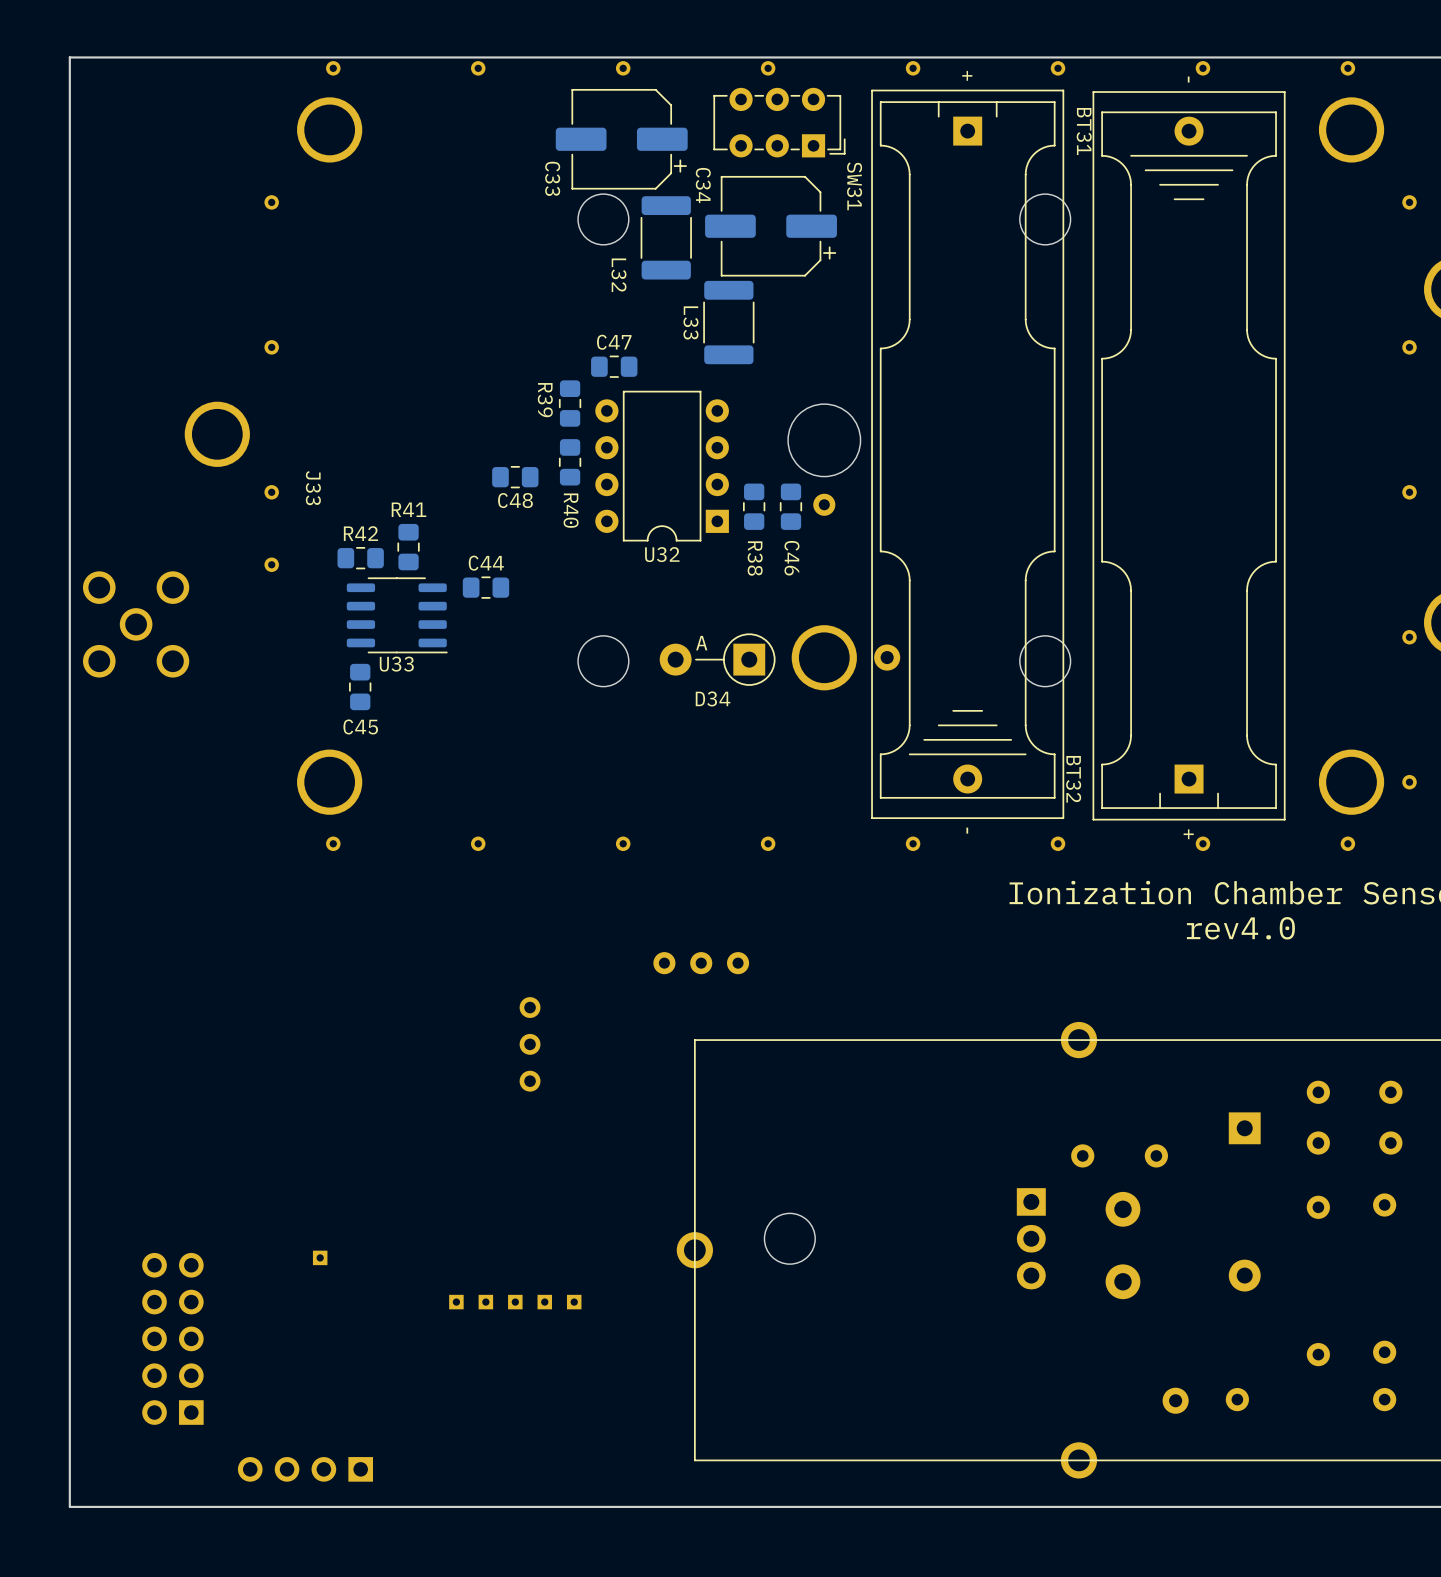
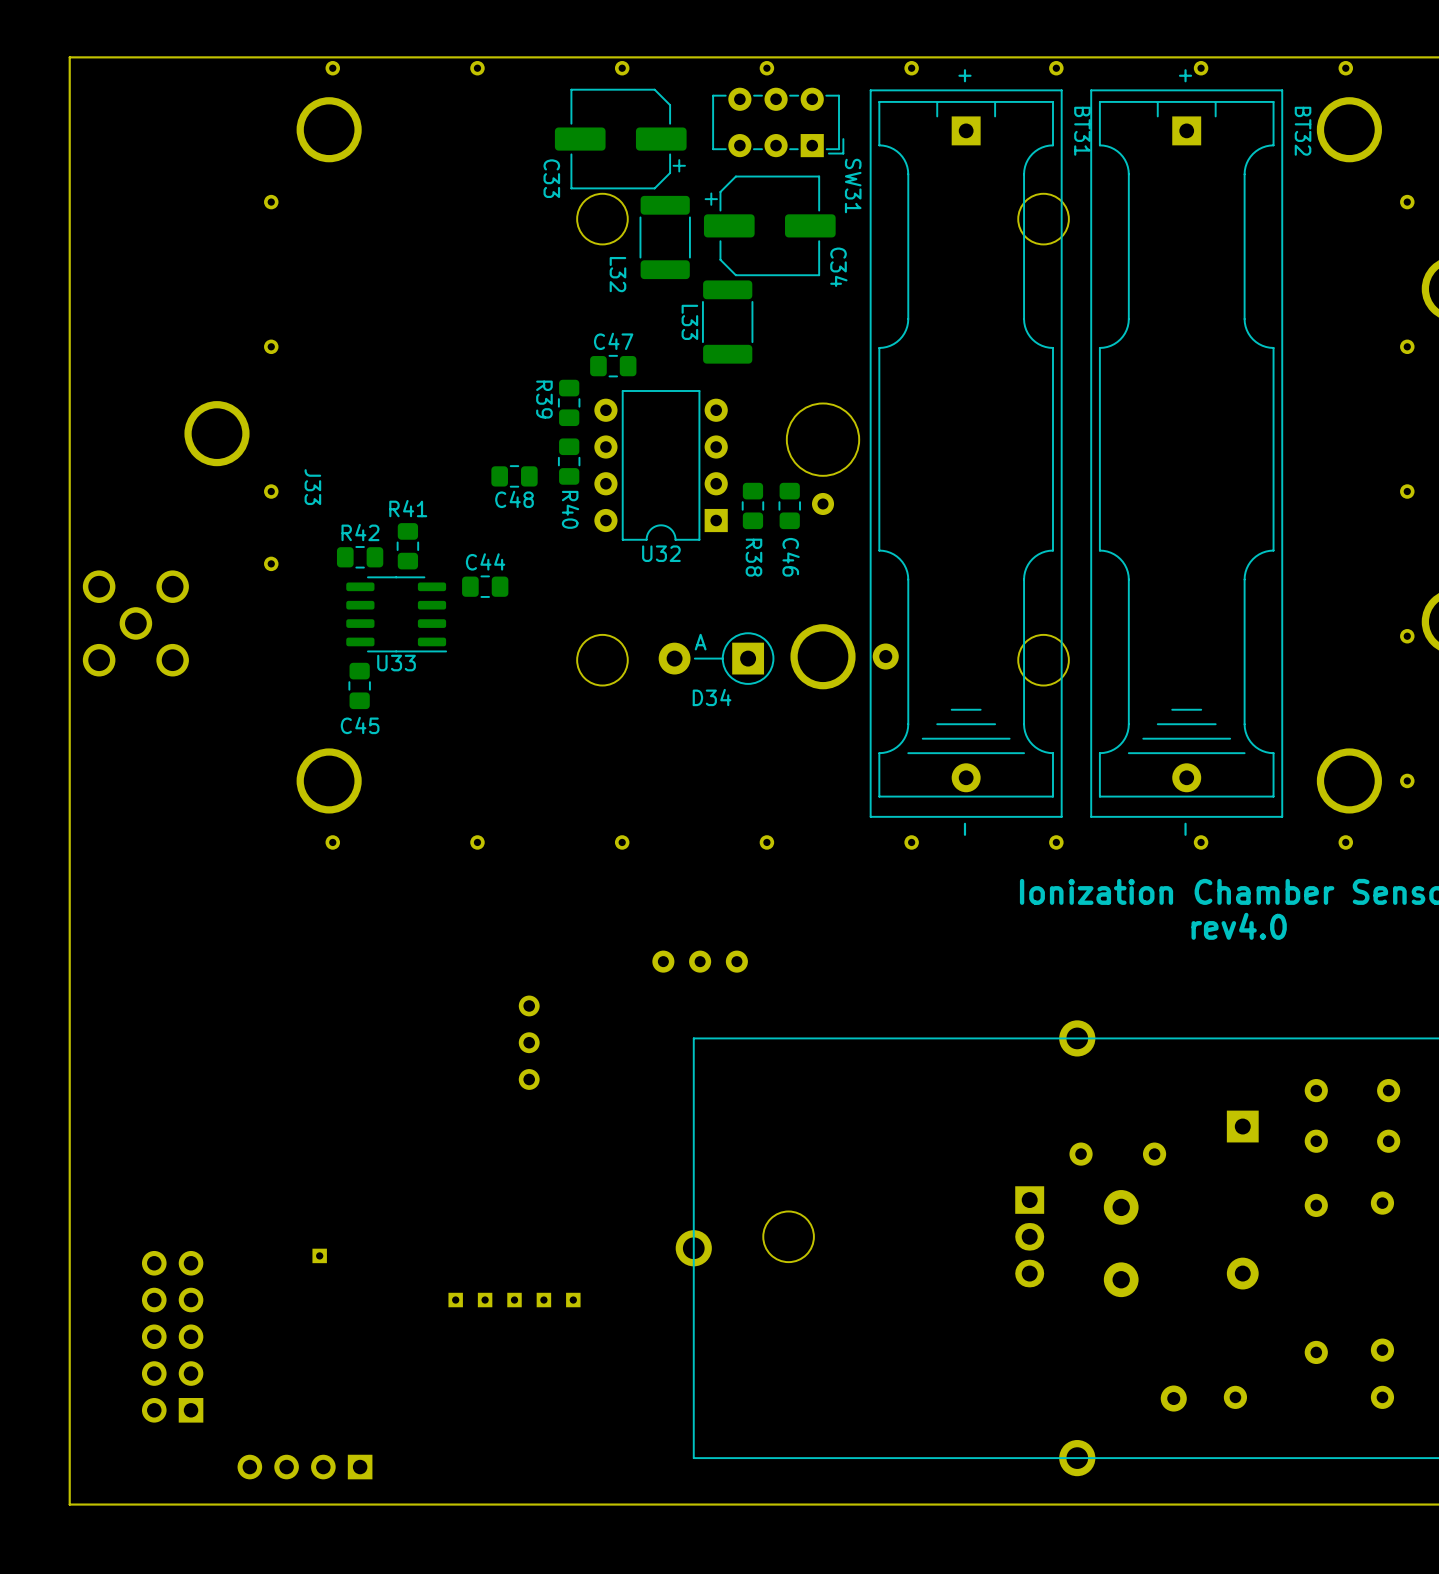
C34 footprint: [705, 175, 837, 277] -> [703, 175, 836, 277]
C34 name position: C34 (703, 185) -> C34 (838, 267)
BT32 rotation: 0° (1189, 455) -> 180° (1186, 453)

